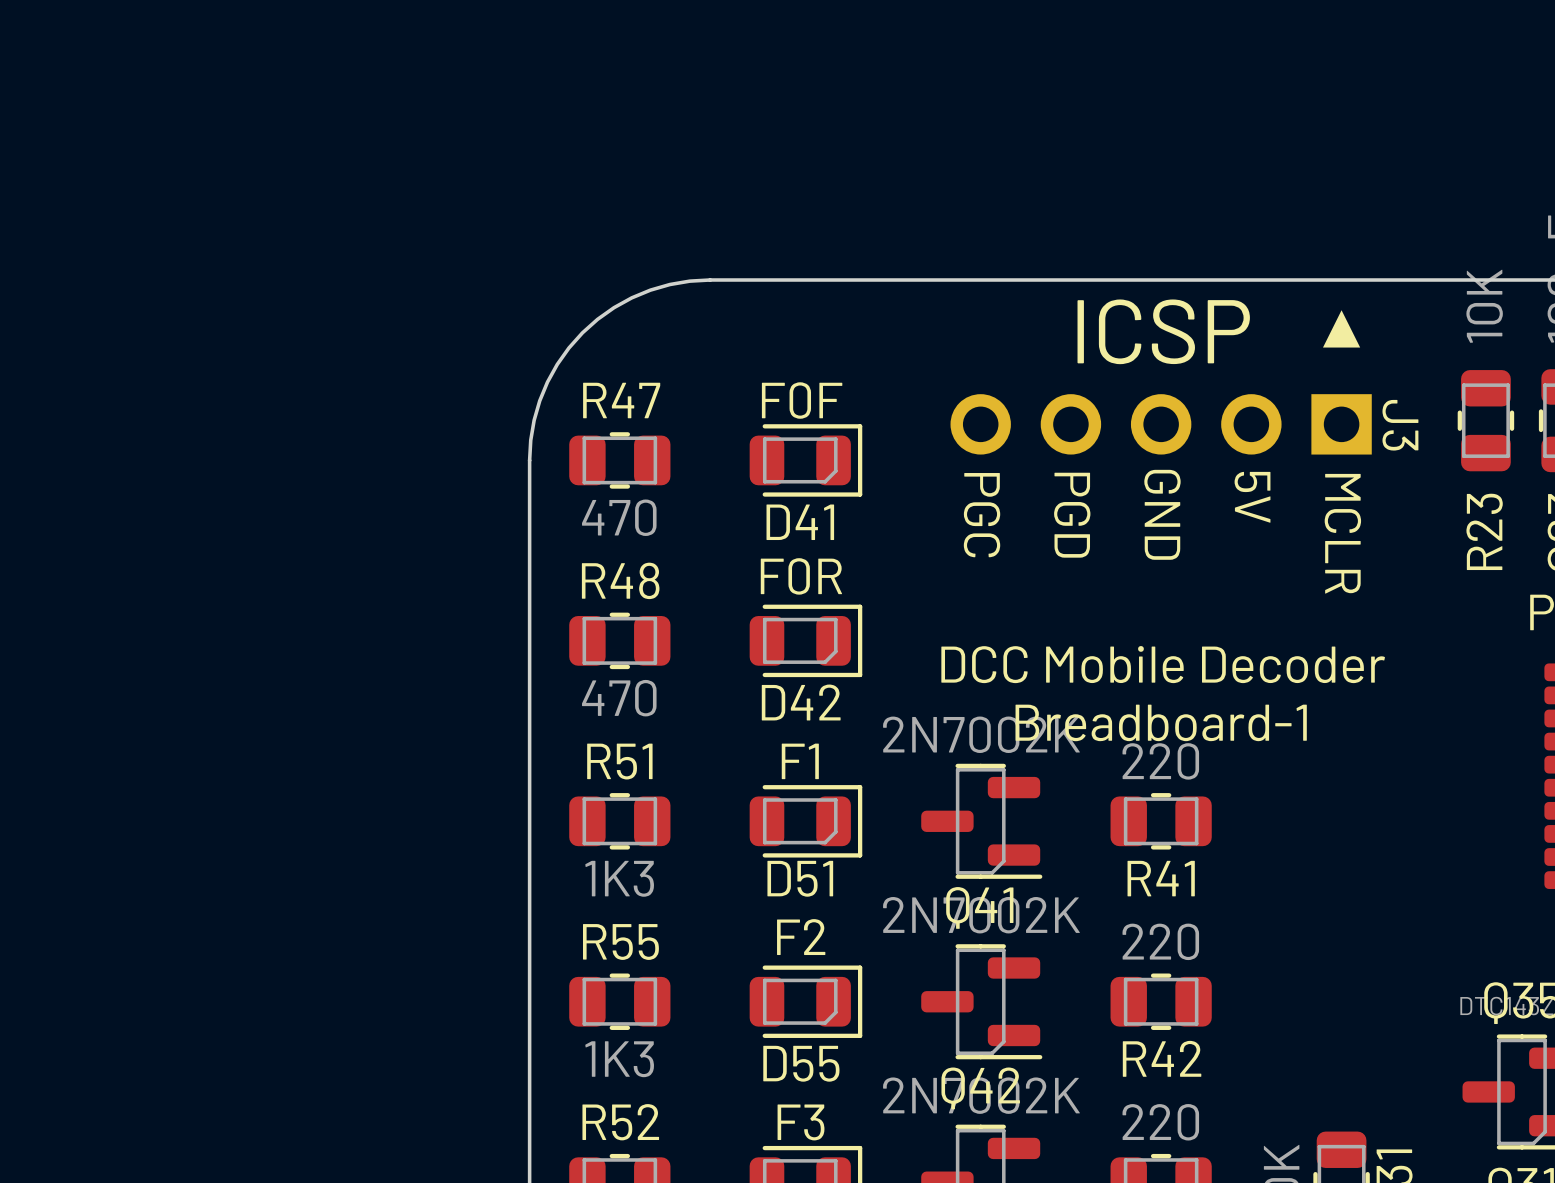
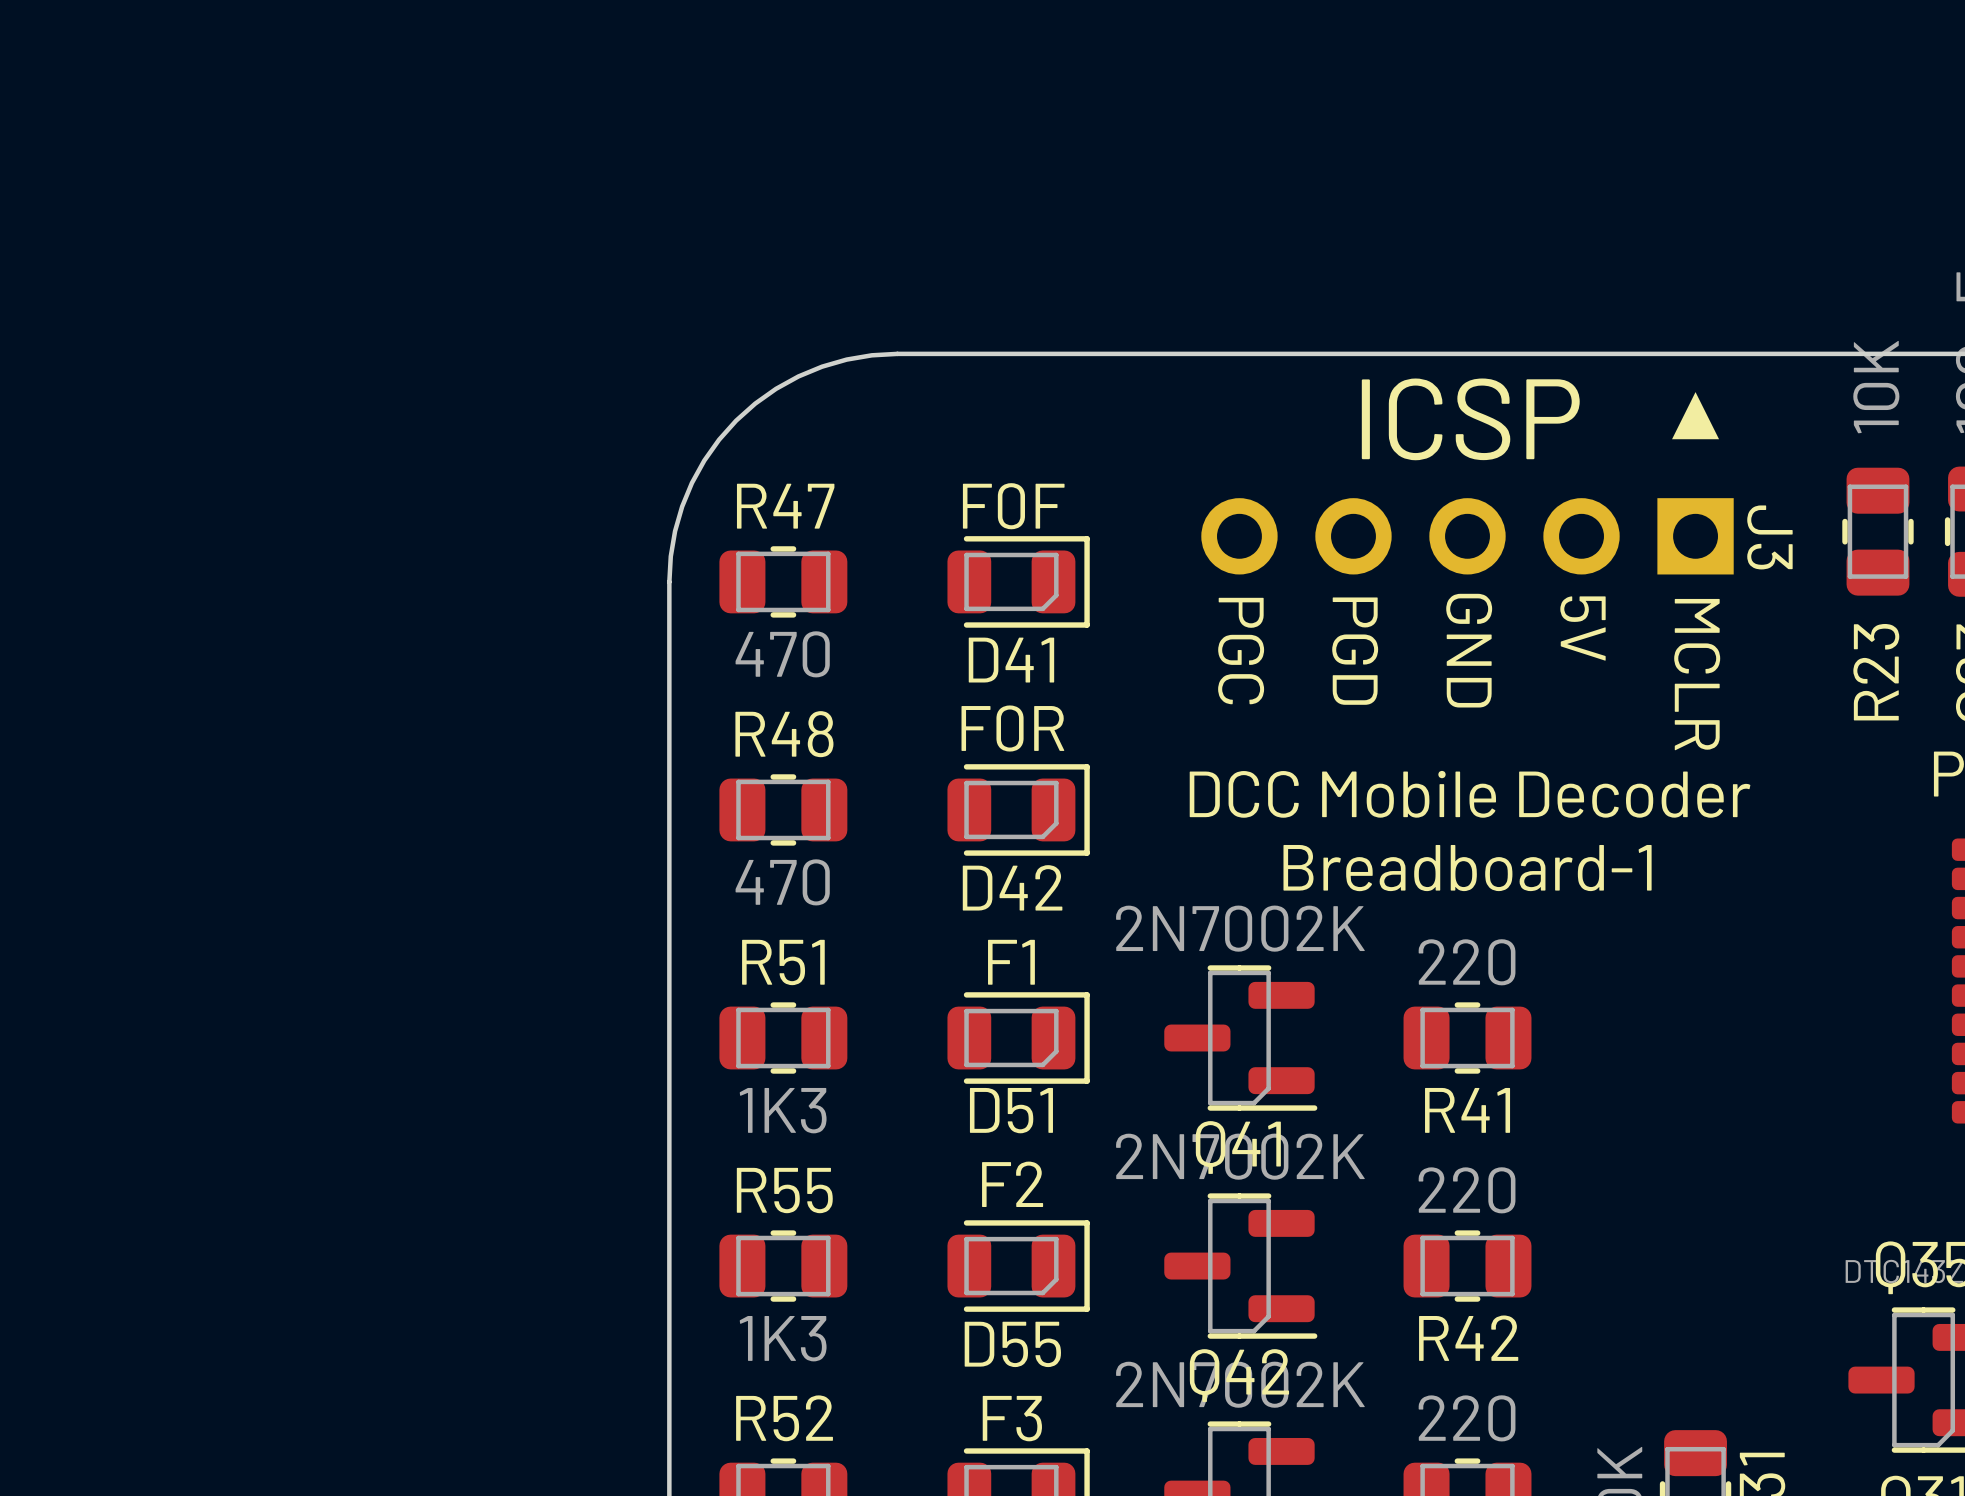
text position: DCC Mobile Decoder (1163, 664) -> DCC Mobile Decoder (1470, 794)
text position: Breadboard-1 (1161, 722) -> Breadboard-1 (1467, 868)

